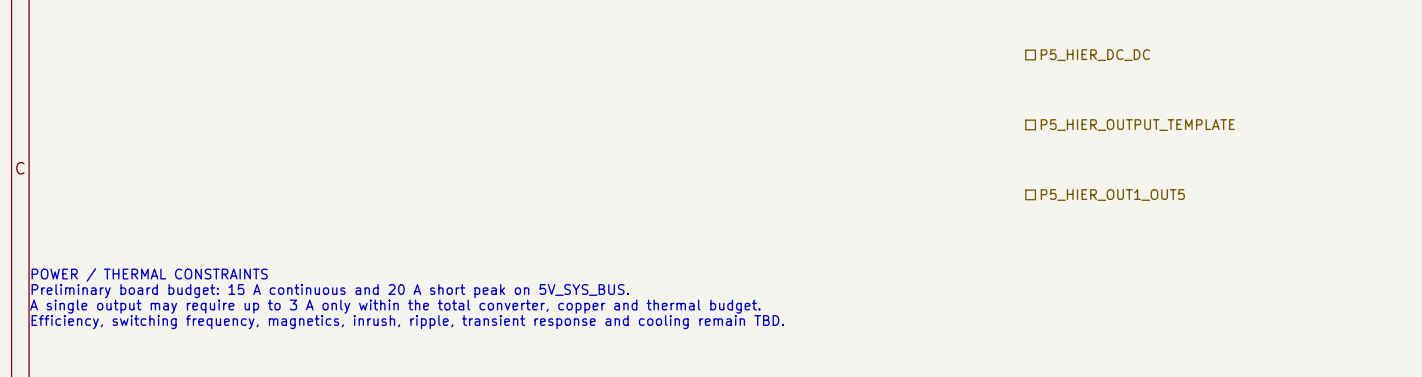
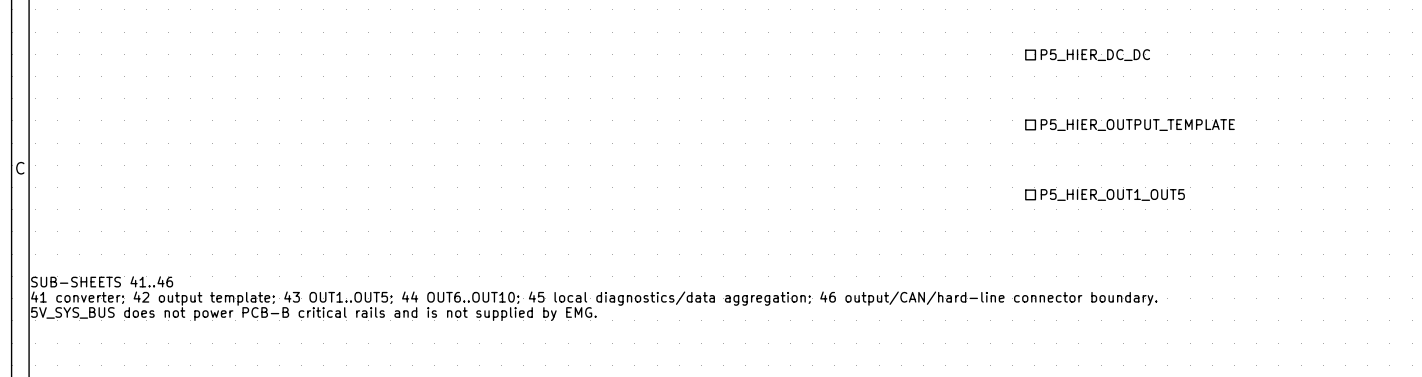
text: POWER / THERMAL CONSTRAINTS (149, 274) -> none
text: none -> SUB-SHEETS 41..46 (102, 281)
text: Preliminary board budget: 15 A continuous and 20 A short peak on 5V_SYS_BUS. (330, 291) -> none
text: none -> 41 converter; 42 output template; 43 OUT1..OUT5; 44 OUT6..OUT10; 45 local diagnostics/data aggregation; 46 output/CAN/hard-line connector boundary. (594, 298)
text: A single output may require up to 3 A only within the total converter, copper and thermal budget. (395, 306) -> none
text: none -> 5V_SYS_BUS does not power PCB-B critical rails and is not supplied by EMG. (313, 314)
text: Efficiency, switching frequency, magnetics, inrush, ripple, transient response and cooling remain TBD. (407, 322) -> none

